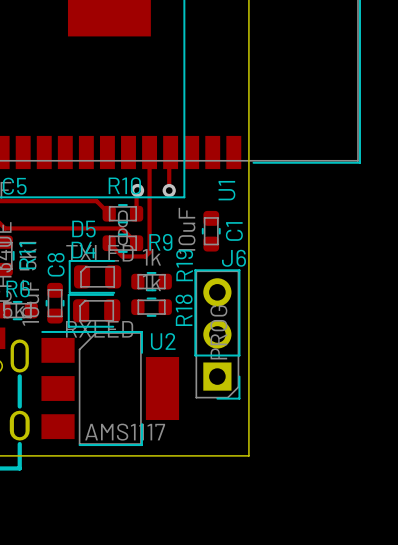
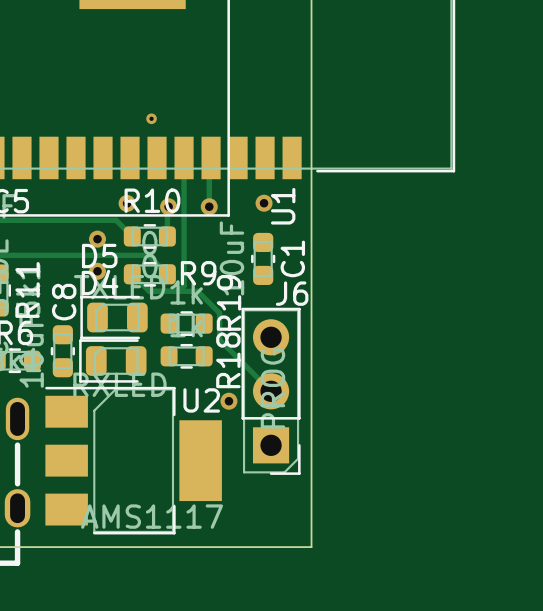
via: none -> (151, 118)
via: none -> (127, 203)
via: none -> (264, 203)
via: none -> (97, 239)
via: none -> (97, 271)
track: none -> (155, 291) (197, 291) (219, 313) (219, 339) (271, 391)
via: none -> (228, 401)

